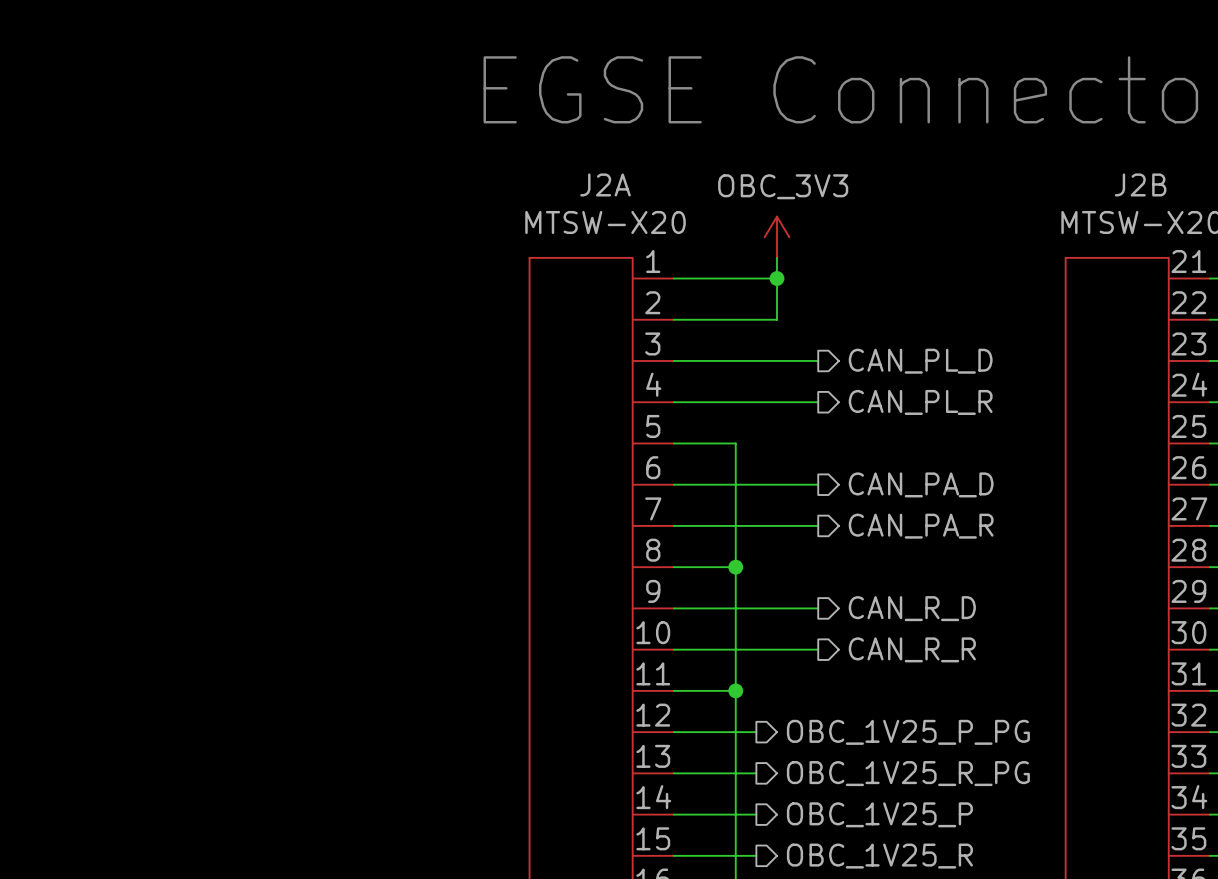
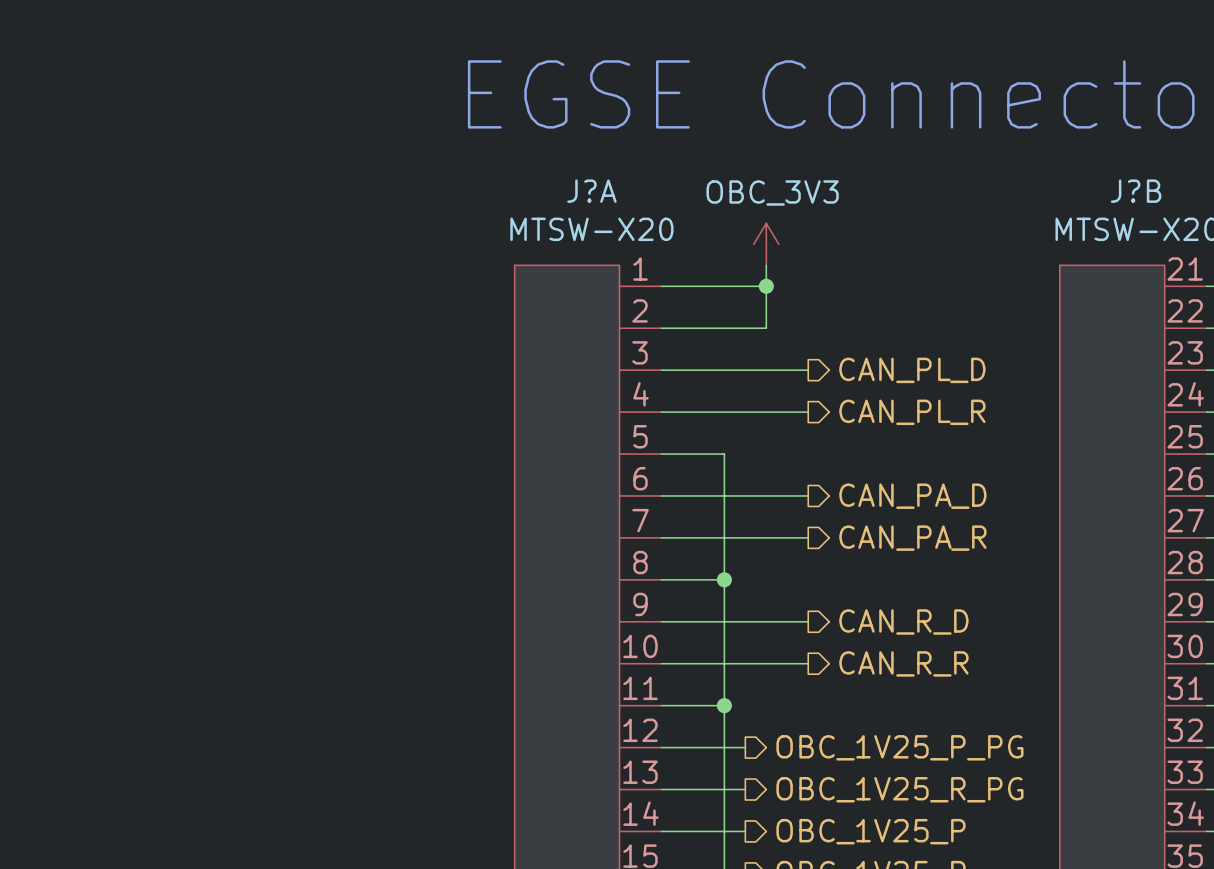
J2A name: J2A (605, 184) -> J?A (591, 191)
J2B name: J2B (1140, 184) -> J?B (1136, 191)

